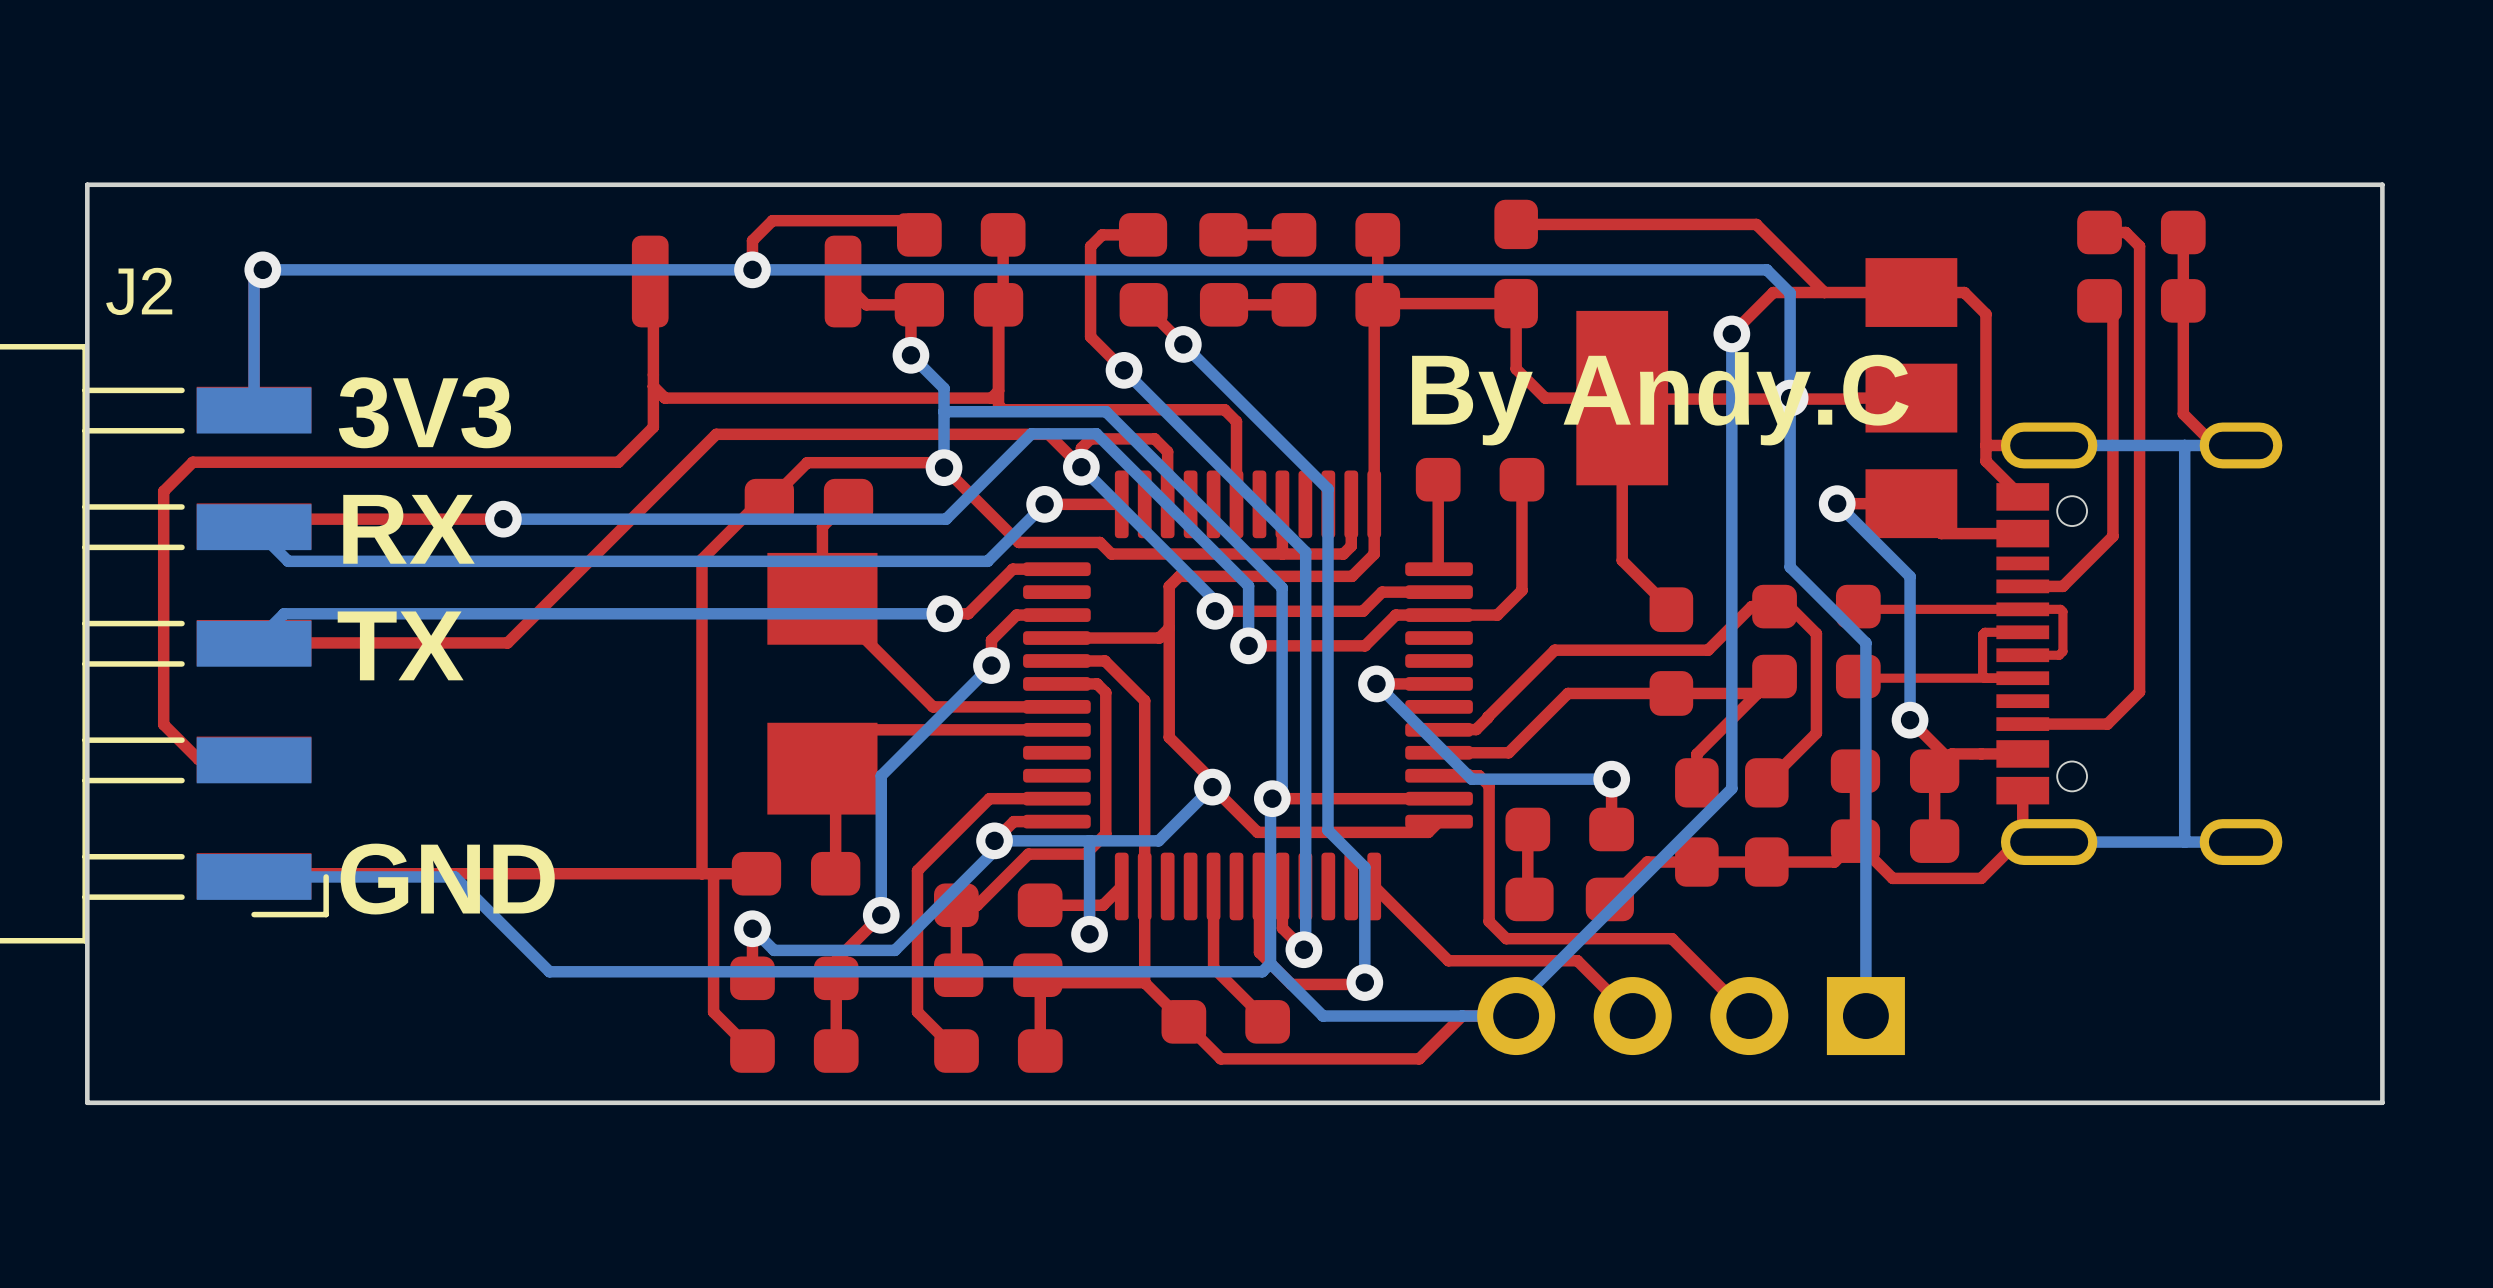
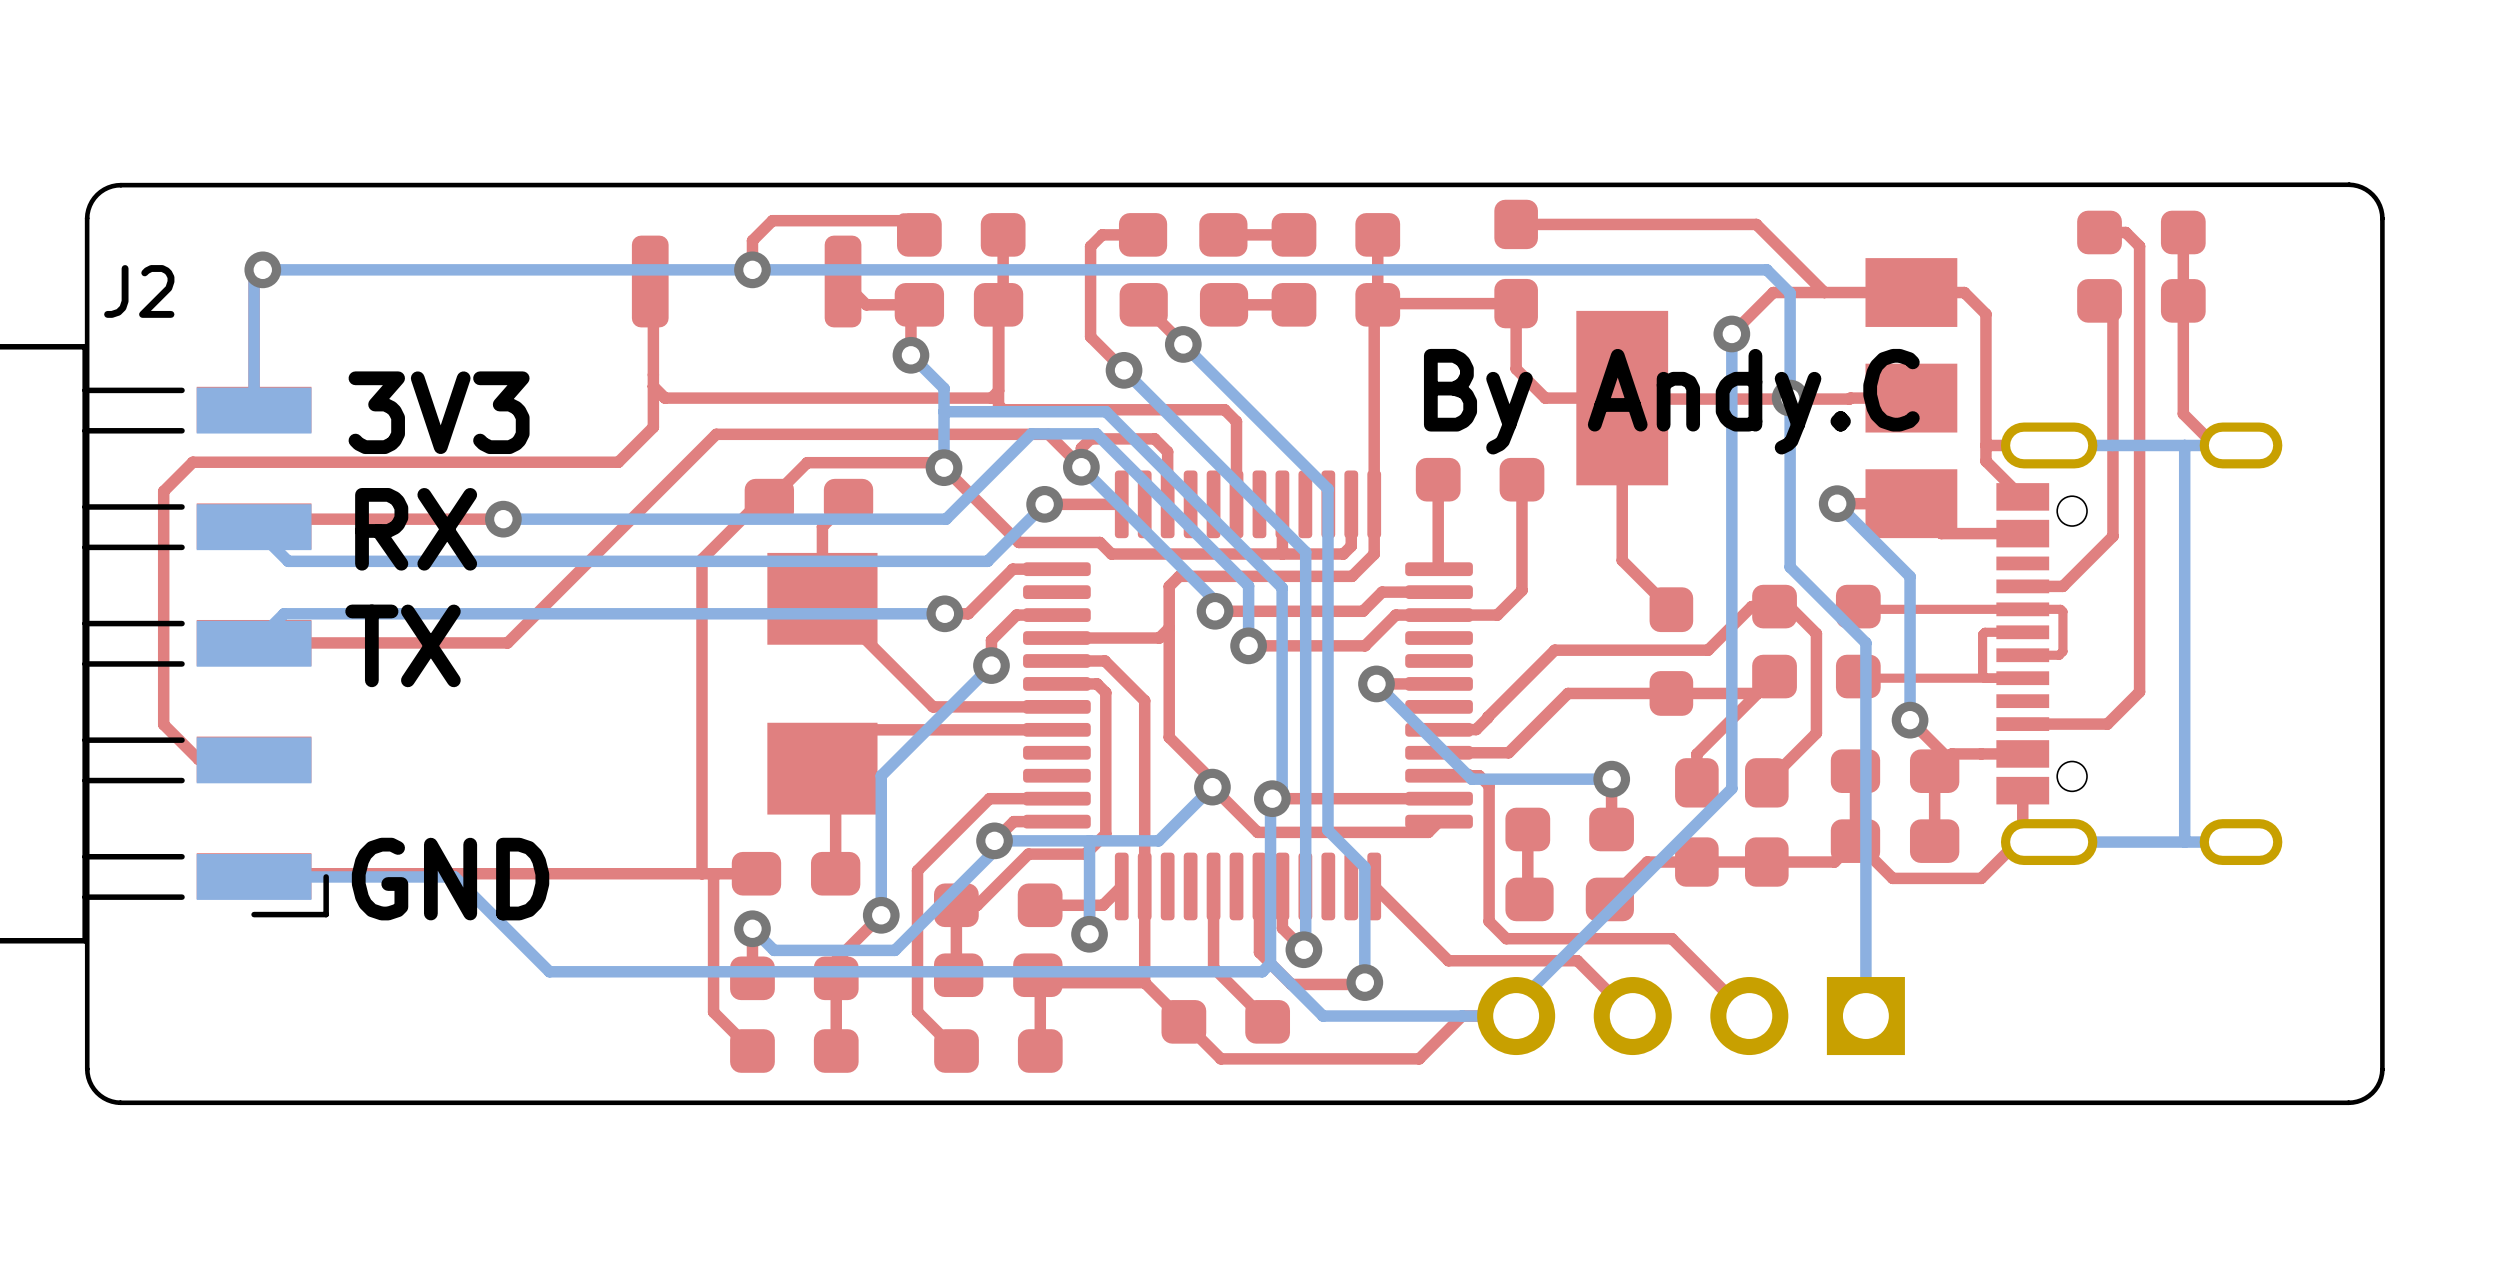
board edge: (2382, 218) (2382, 184) (87, 184) (87, 1102) (120, 1102) -> (2382, 218) (2379, 205) (2372, 194) (2361, 187) (2349, 184) (120, 185) (108, 187) (94, 198) (89, 205) (87, 218) (87, 1068) (89, 1081) (96, 1092) (107, 1100) (120, 1102)
board edge: (2382, 1069) (2382, 1102) (2348, 1102) -> (2382, 1069) (2379, 1082) (2372, 1093) (2361, 1100) (2348, 1102)

